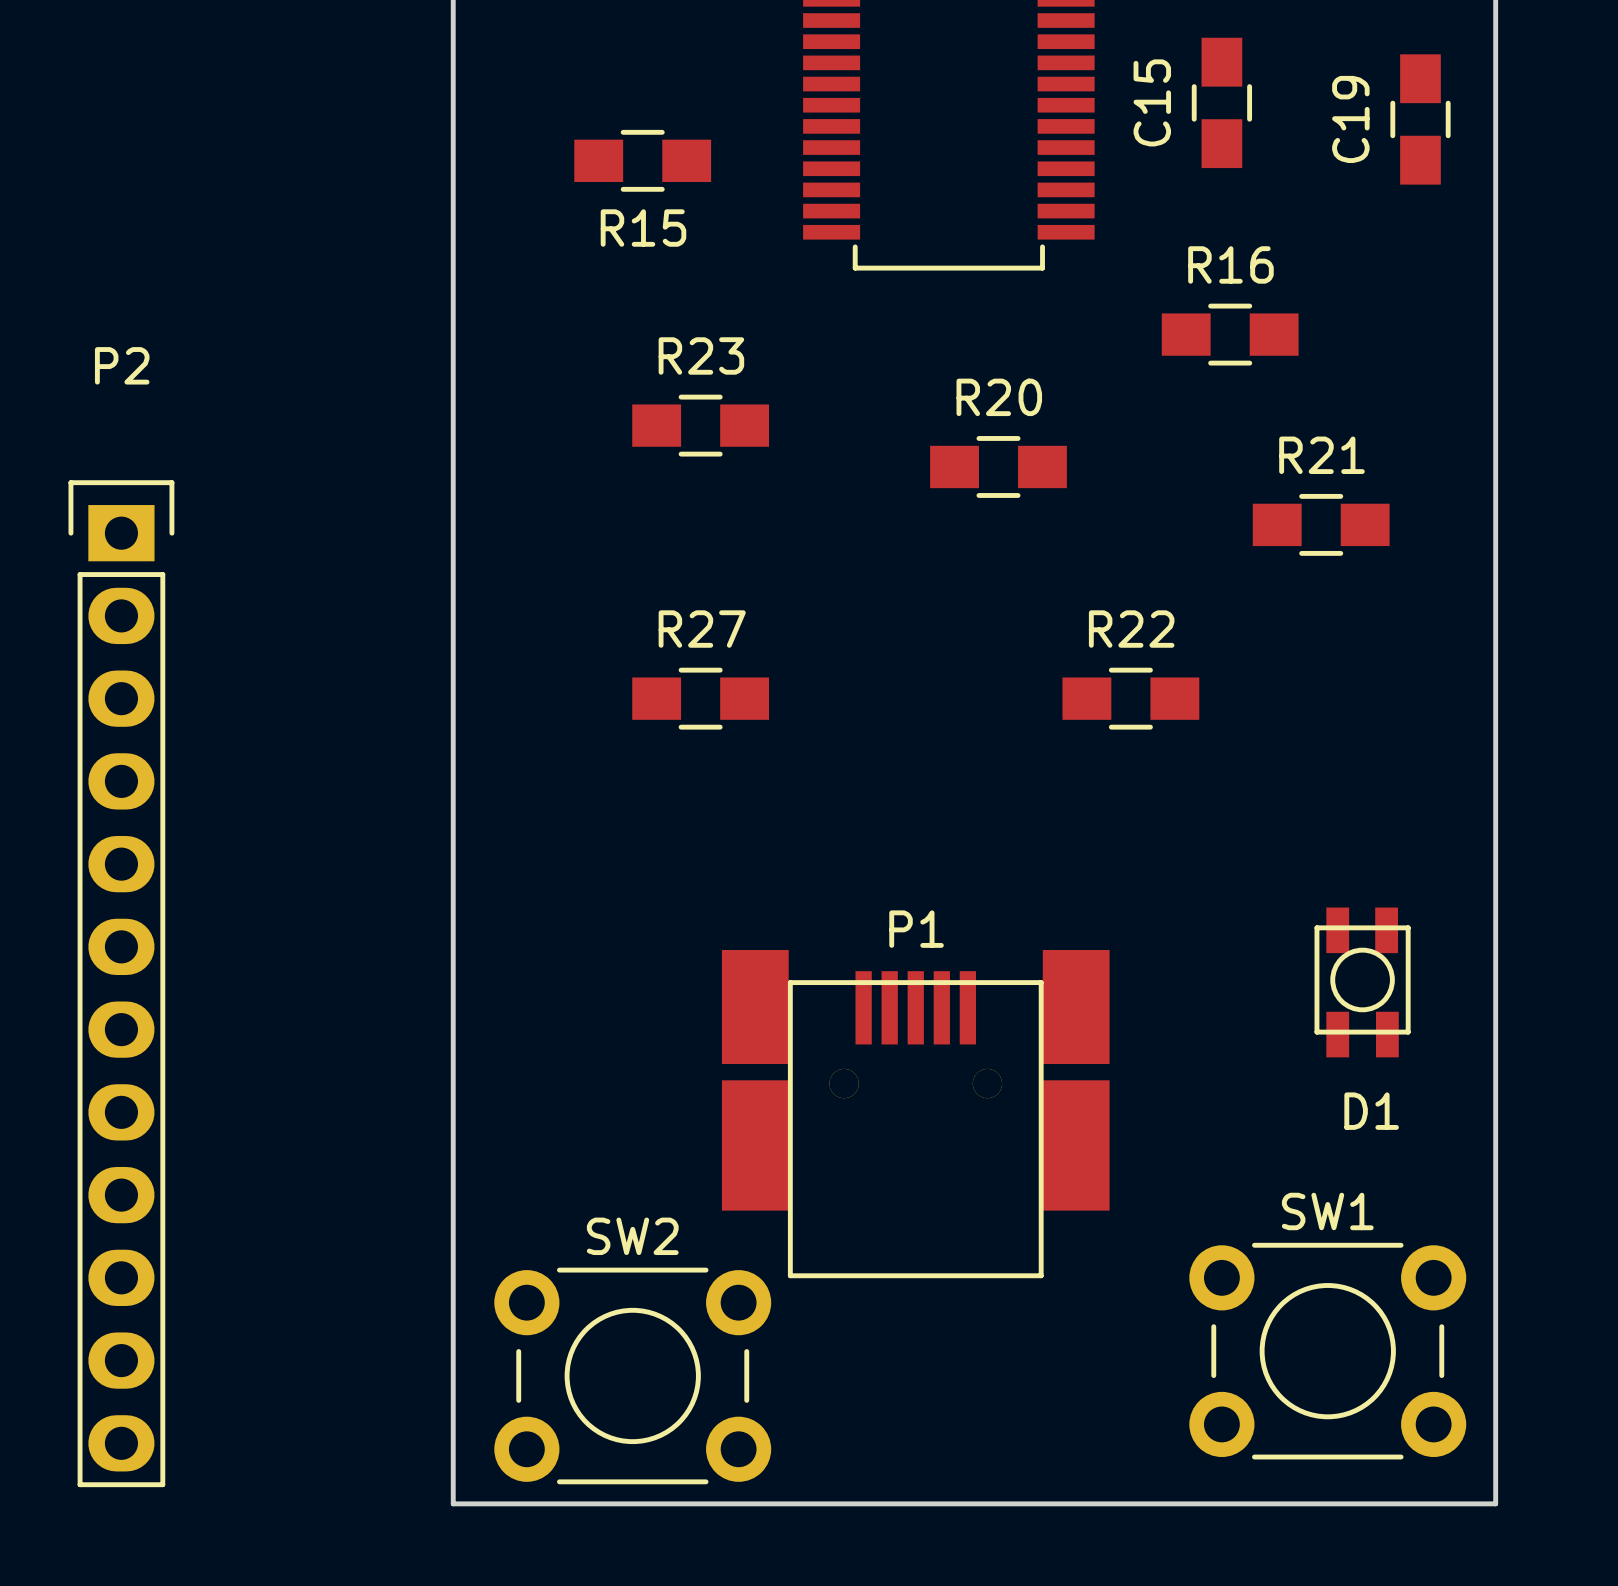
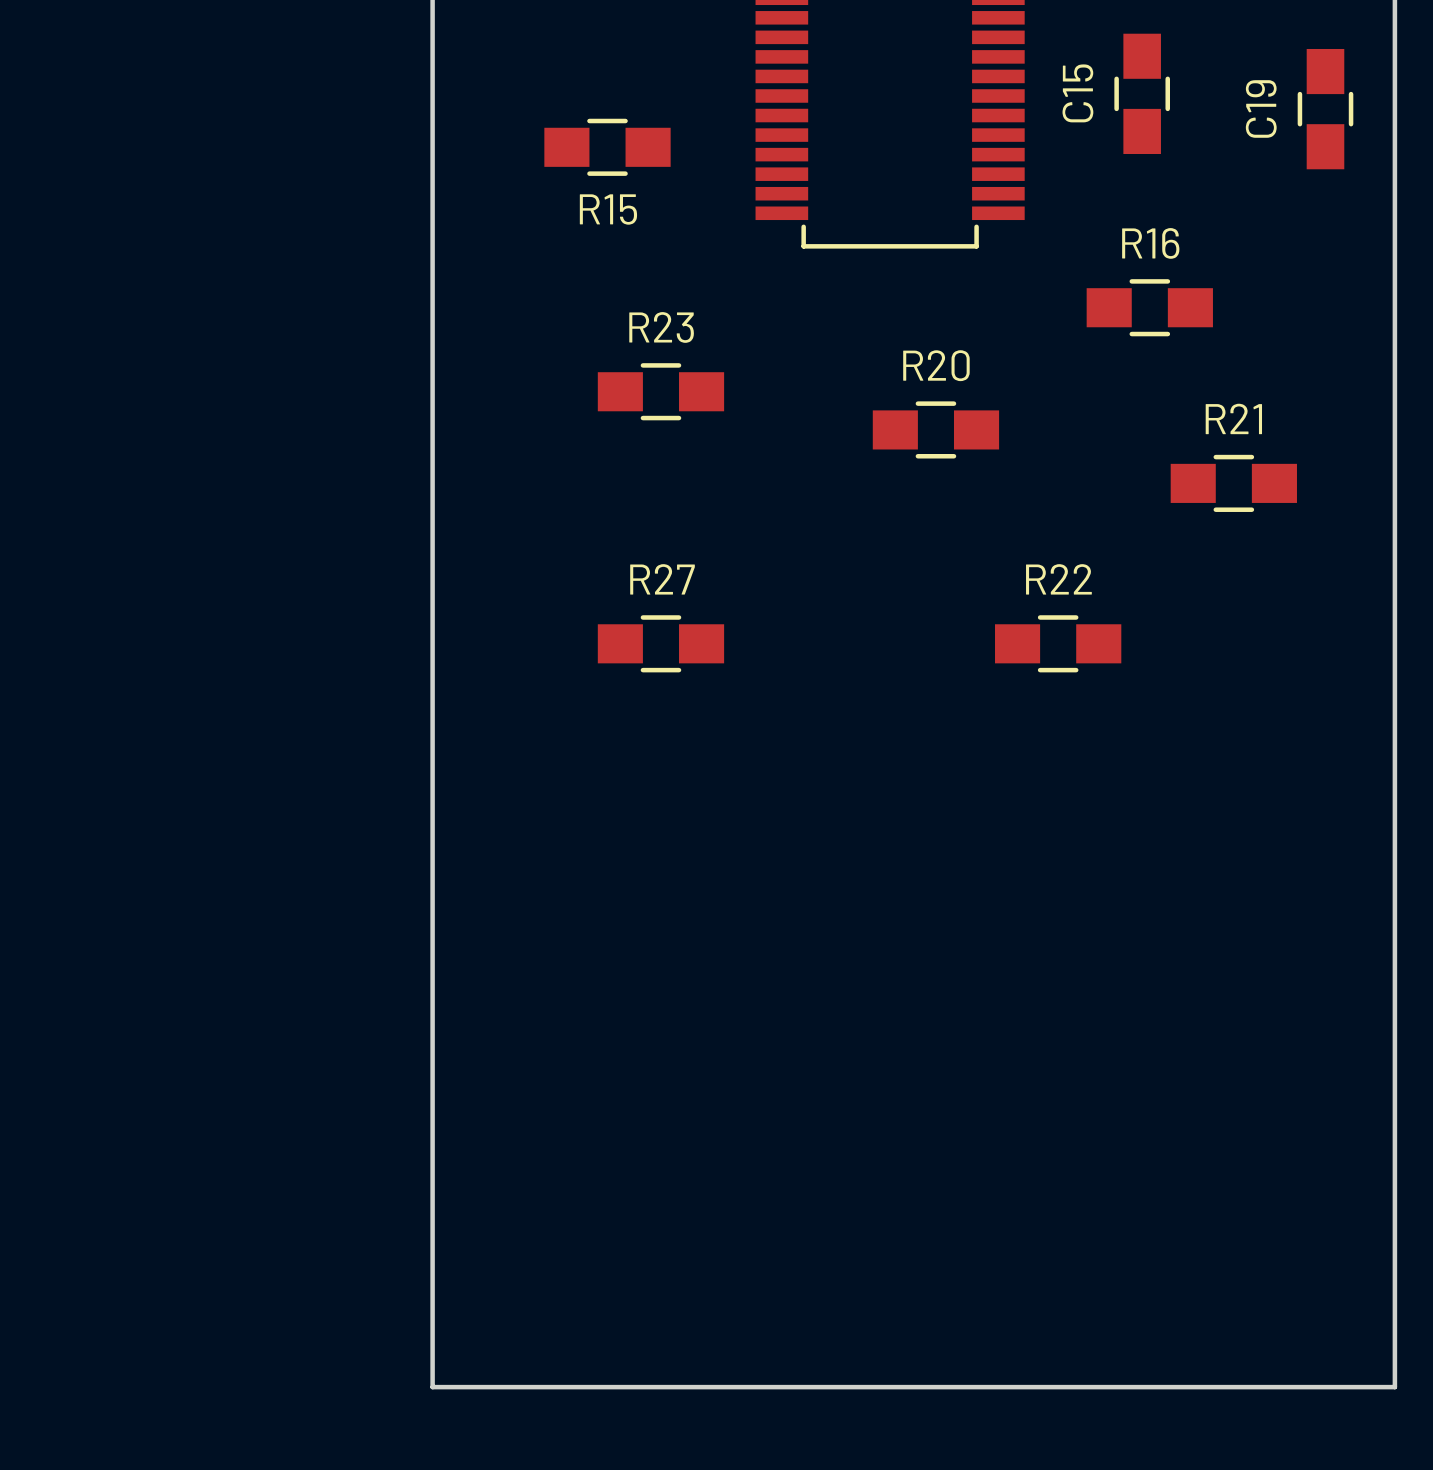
D1: (1362, 982) -> none
P2: (121, 983) -> none
P1: (915, 1114) -> none
SW1: (1327, 1351) -> none
SW2: (632, 1375) -> none

